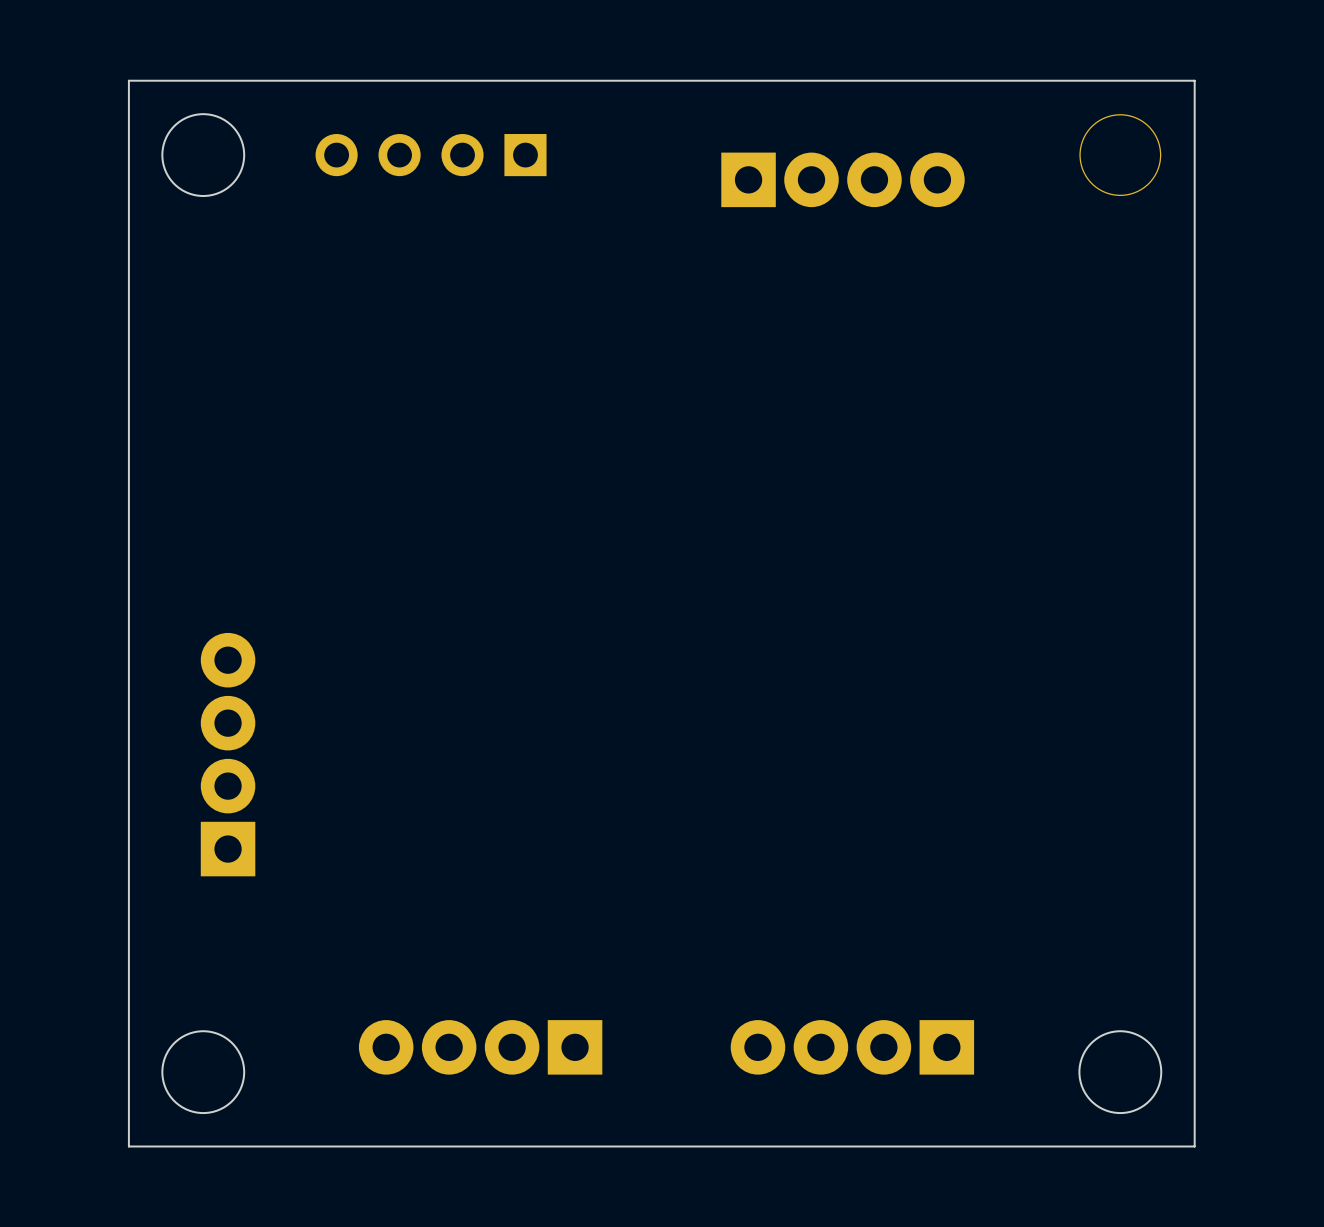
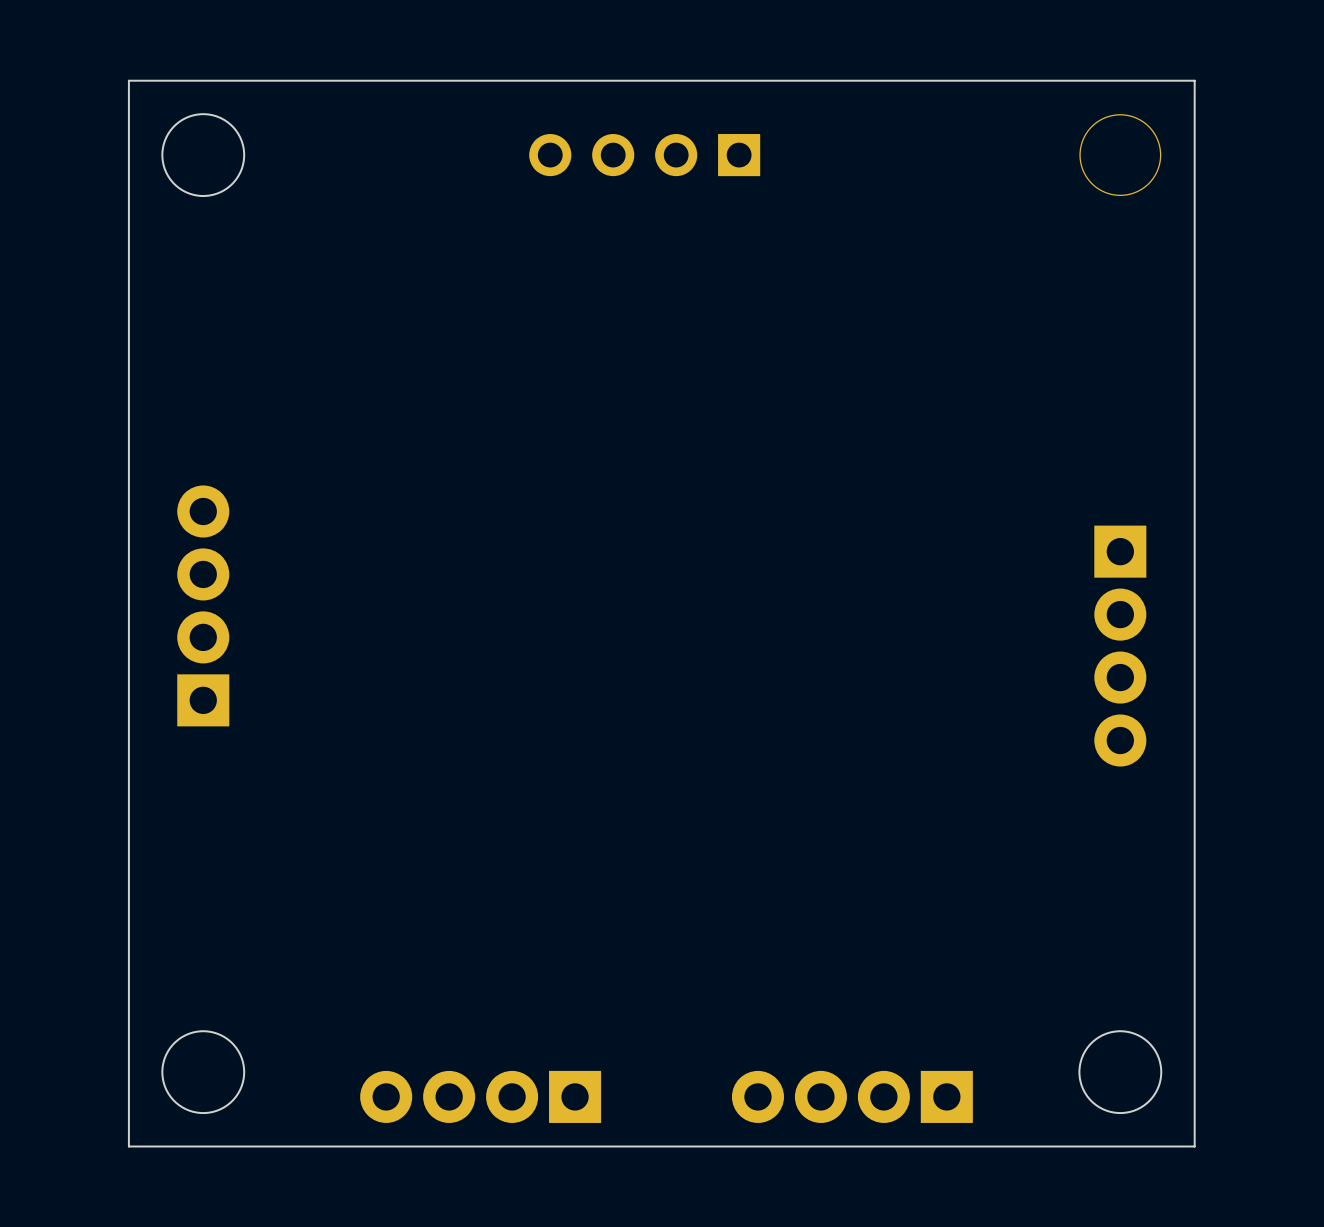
part position: (431, 155) -> (644, 155)
part: (842, 179) -> none
part: none -> (203, 605)
part: none -> (1120, 646)
part: (228, 754) -> none
part: (480, 1047) -> none
part: (852, 1047) -> none
part: none -> (480, 1096)
part: none -> (852, 1096)

